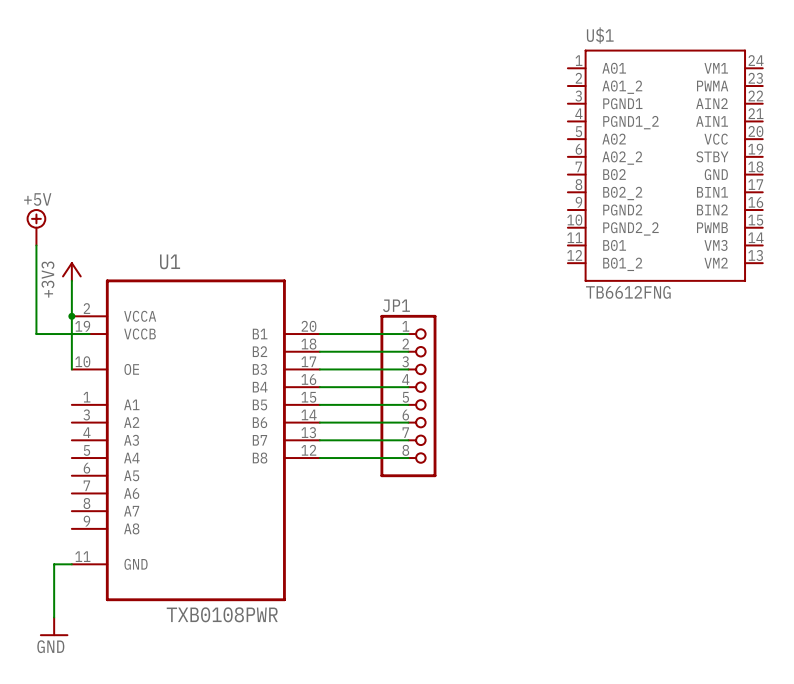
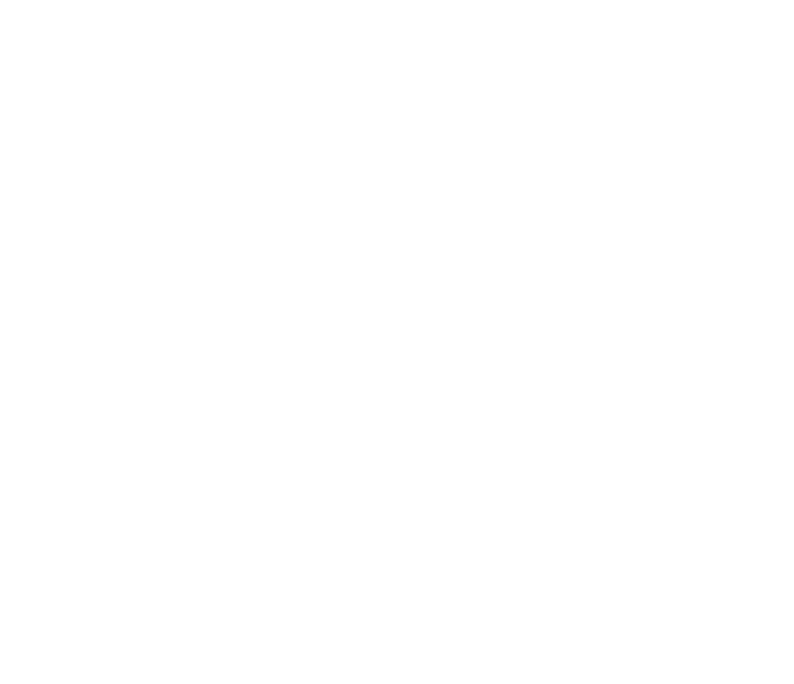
U$1: TB6612FNG (665, 165) -> none
power symbol: +5V (36, 227) -> none
wire: (36, 245) (36, 334) (89, 334) -> none
power symbol: +3V3 (71, 271) -> none
wire: (71, 280) (71, 369) -> none
junction: (71, 316) -> none
wire: (319, 334) (408, 334) -> none
wire: (319, 351) (408, 351) -> none
wire: (319, 369) (408, 369) -> none
wire: (319, 387) (408, 387) -> none
JP1: (408, 396) -> none
wire: (319, 404) (408, 404) -> none
wire: (319, 422) (408, 422) -> none
U1: TXB0108PWR (195, 440) -> none
wire: (319, 440) (408, 440) -> none
wire: (319, 458) (408, 458) -> none
wire: (71, 564) (54, 564) (54, 617) -> none
power symbol: GND (54, 626) -> none

